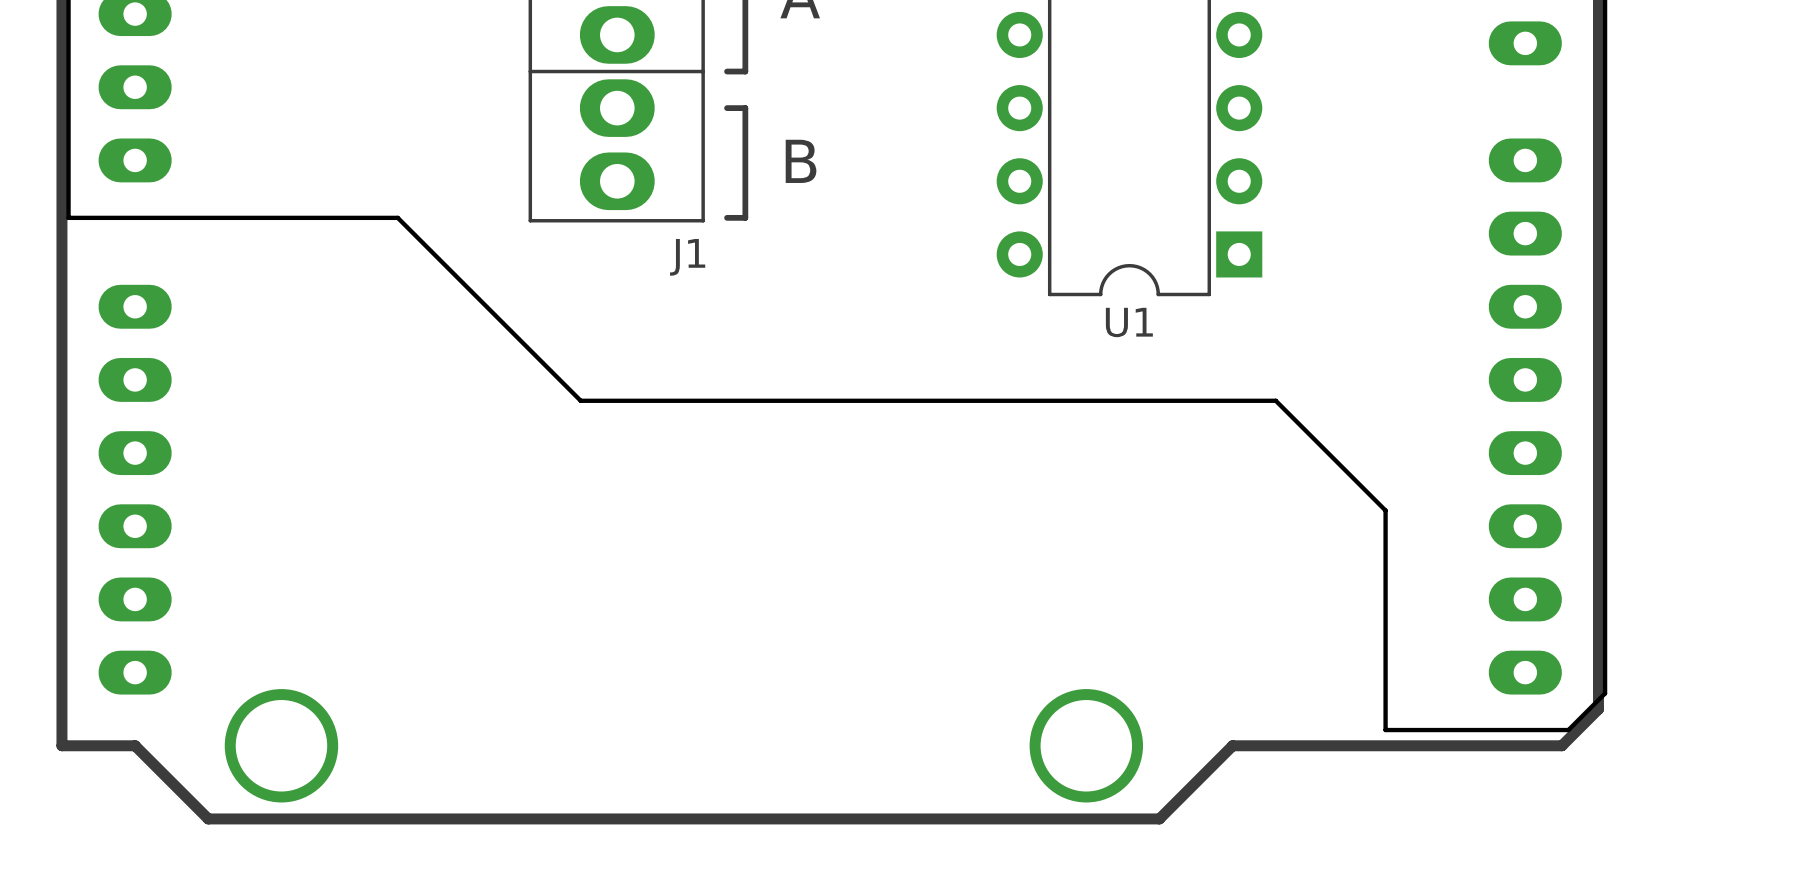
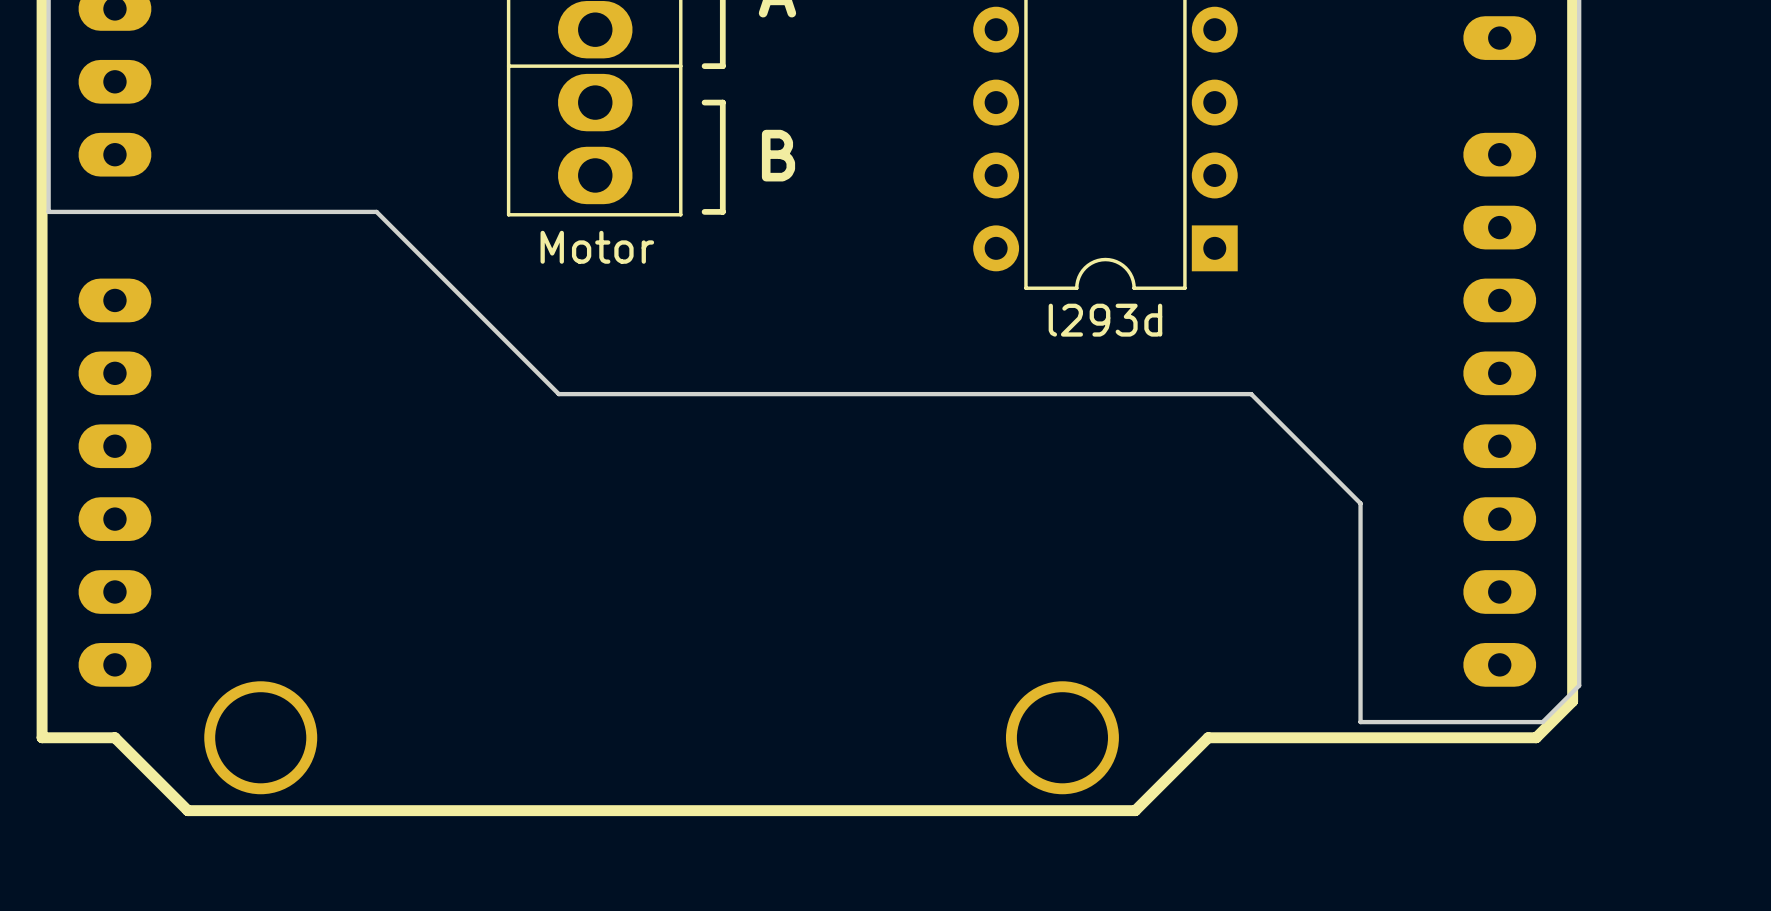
text: none -> Motor (597, 247)
J1 name: J1 (687, 257) -> none
U1 name: U1 (1129, 322) -> none
text: none -> l293d (1105, 320)

